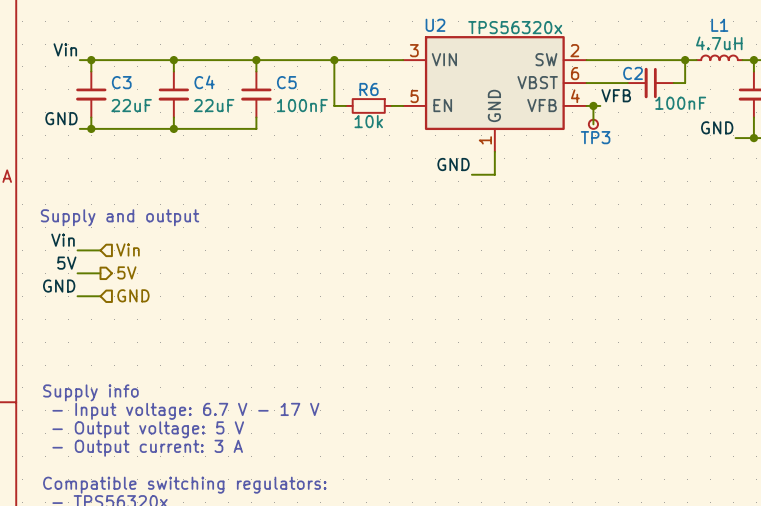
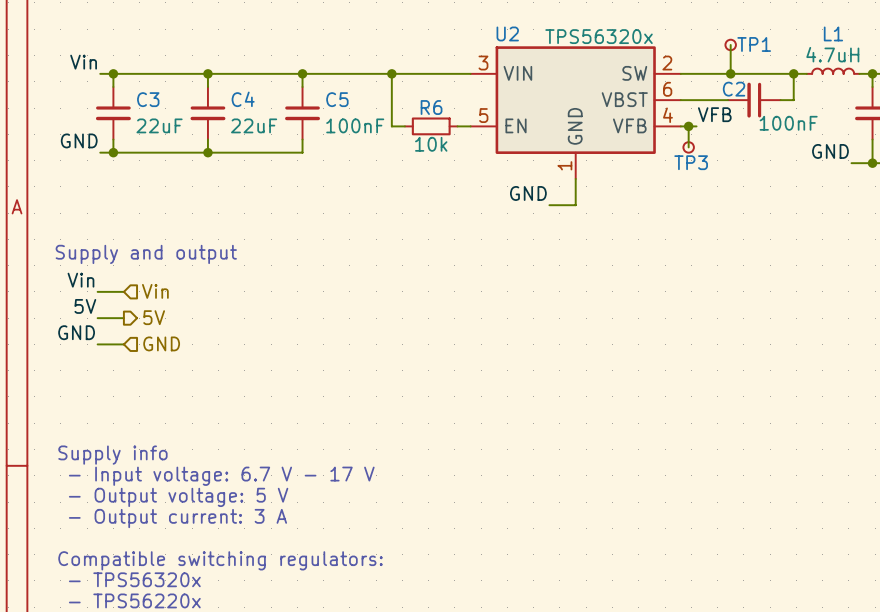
wire: none -> (730, 44) (730, 73)
TP1: none -> (730, 44)
junction: none -> (730, 73)

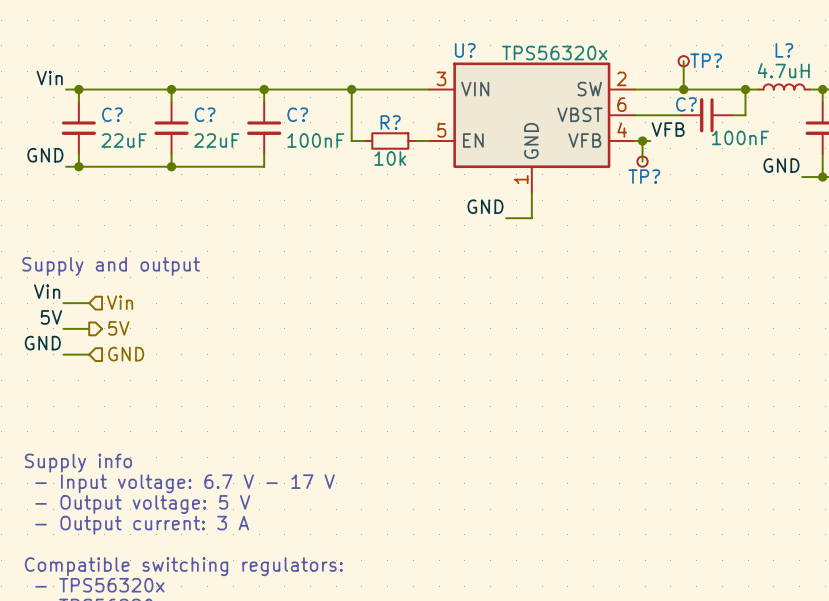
U2 name: U2 (507, 33) -> U? (465, 50)
L1 name: L1 (833, 33) -> L? (784, 50)
TP1 name: TP1 (754, 44) -> TP? (706, 60)
C2 name: C2 (734, 89) -> C? (686, 104)
C3 name: C3 (148, 99) -> C? (112, 114)
C4 name: C4 (243, 99) -> C? (205, 114)
C5 name: C5 (337, 99) -> C? (297, 114)
R6 name: R6 (431, 107) -> R? (390, 122)
TP3 name: TP3 (691, 162) -> TP? (644, 176)

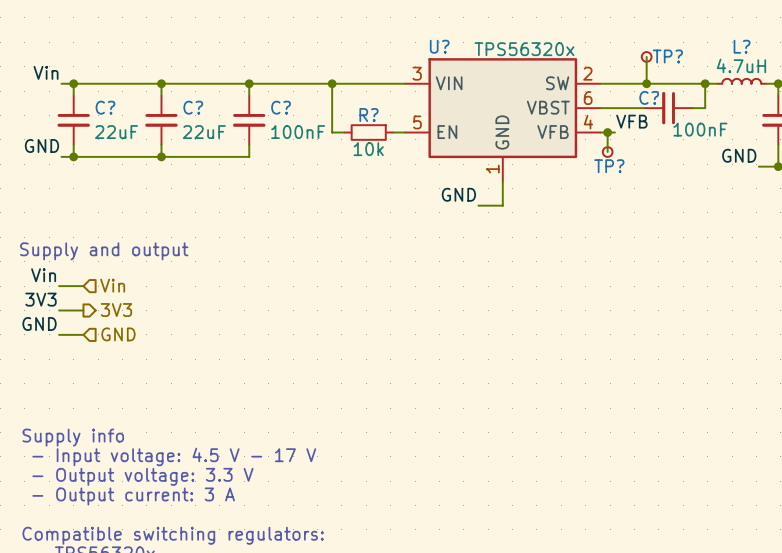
label: 5V (51, 317) -> 3V3 (40, 299)
hierarchical label: 5V (118, 328) -> 3V3 (116, 310)
text: - Input voltage: 6.7 V - 17 V (185, 483) -> - Input voltage: 4.5 V - 17 V (174, 456)
text: - Output voltage: 5 V (142, 504) -> - Output voltage: 3.3 V (142, 476)

